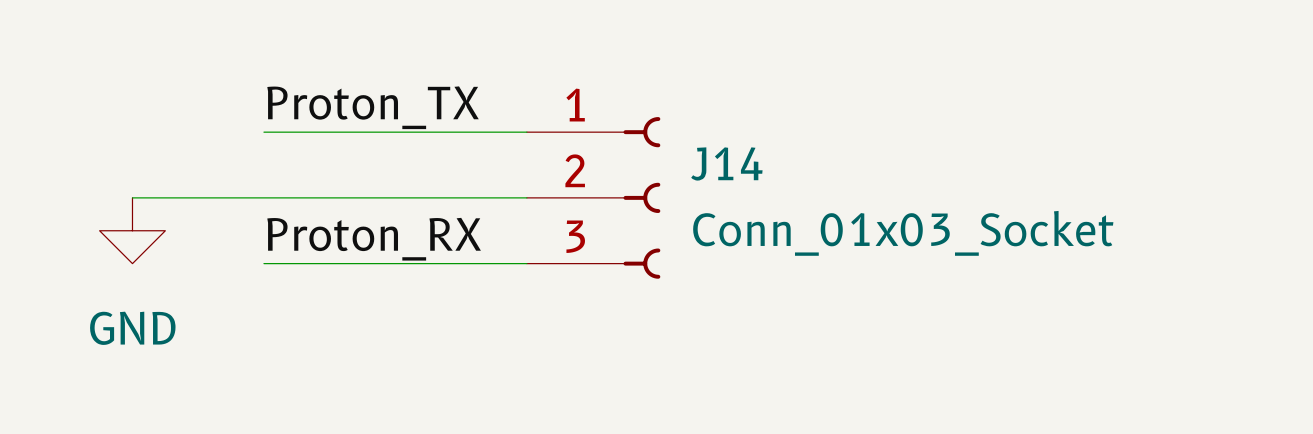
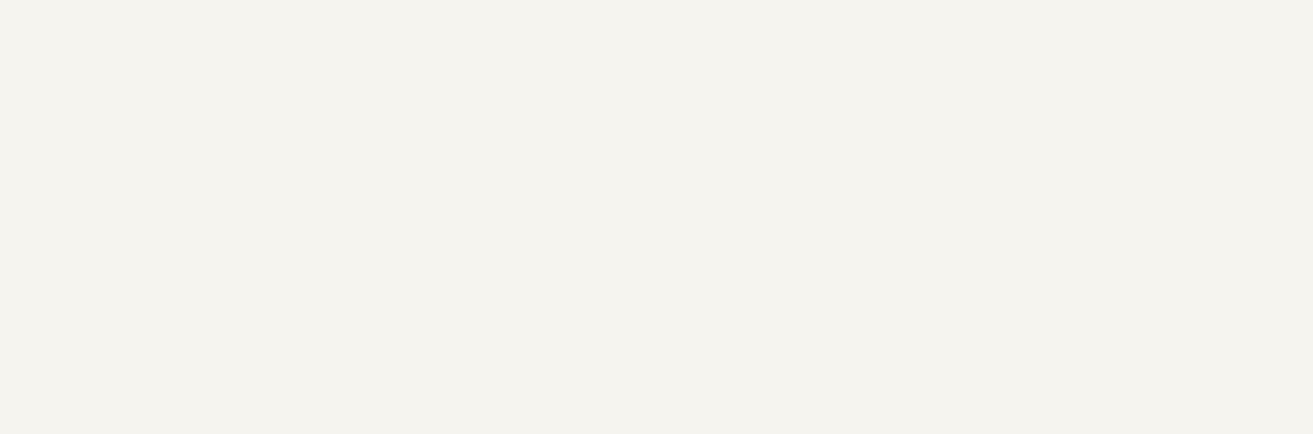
label: Proton_TX (373, 107) -> none
wire: (263, 132) (526, 132) -> none
wire: (132, 197) (526, 197) -> none
J14: Conn_01x03_Socket (593, 197) -> none
power symbol: GND (132, 230) -> none
label: Proton_RX (374, 239) -> none
wire: (263, 263) (526, 263) -> none

